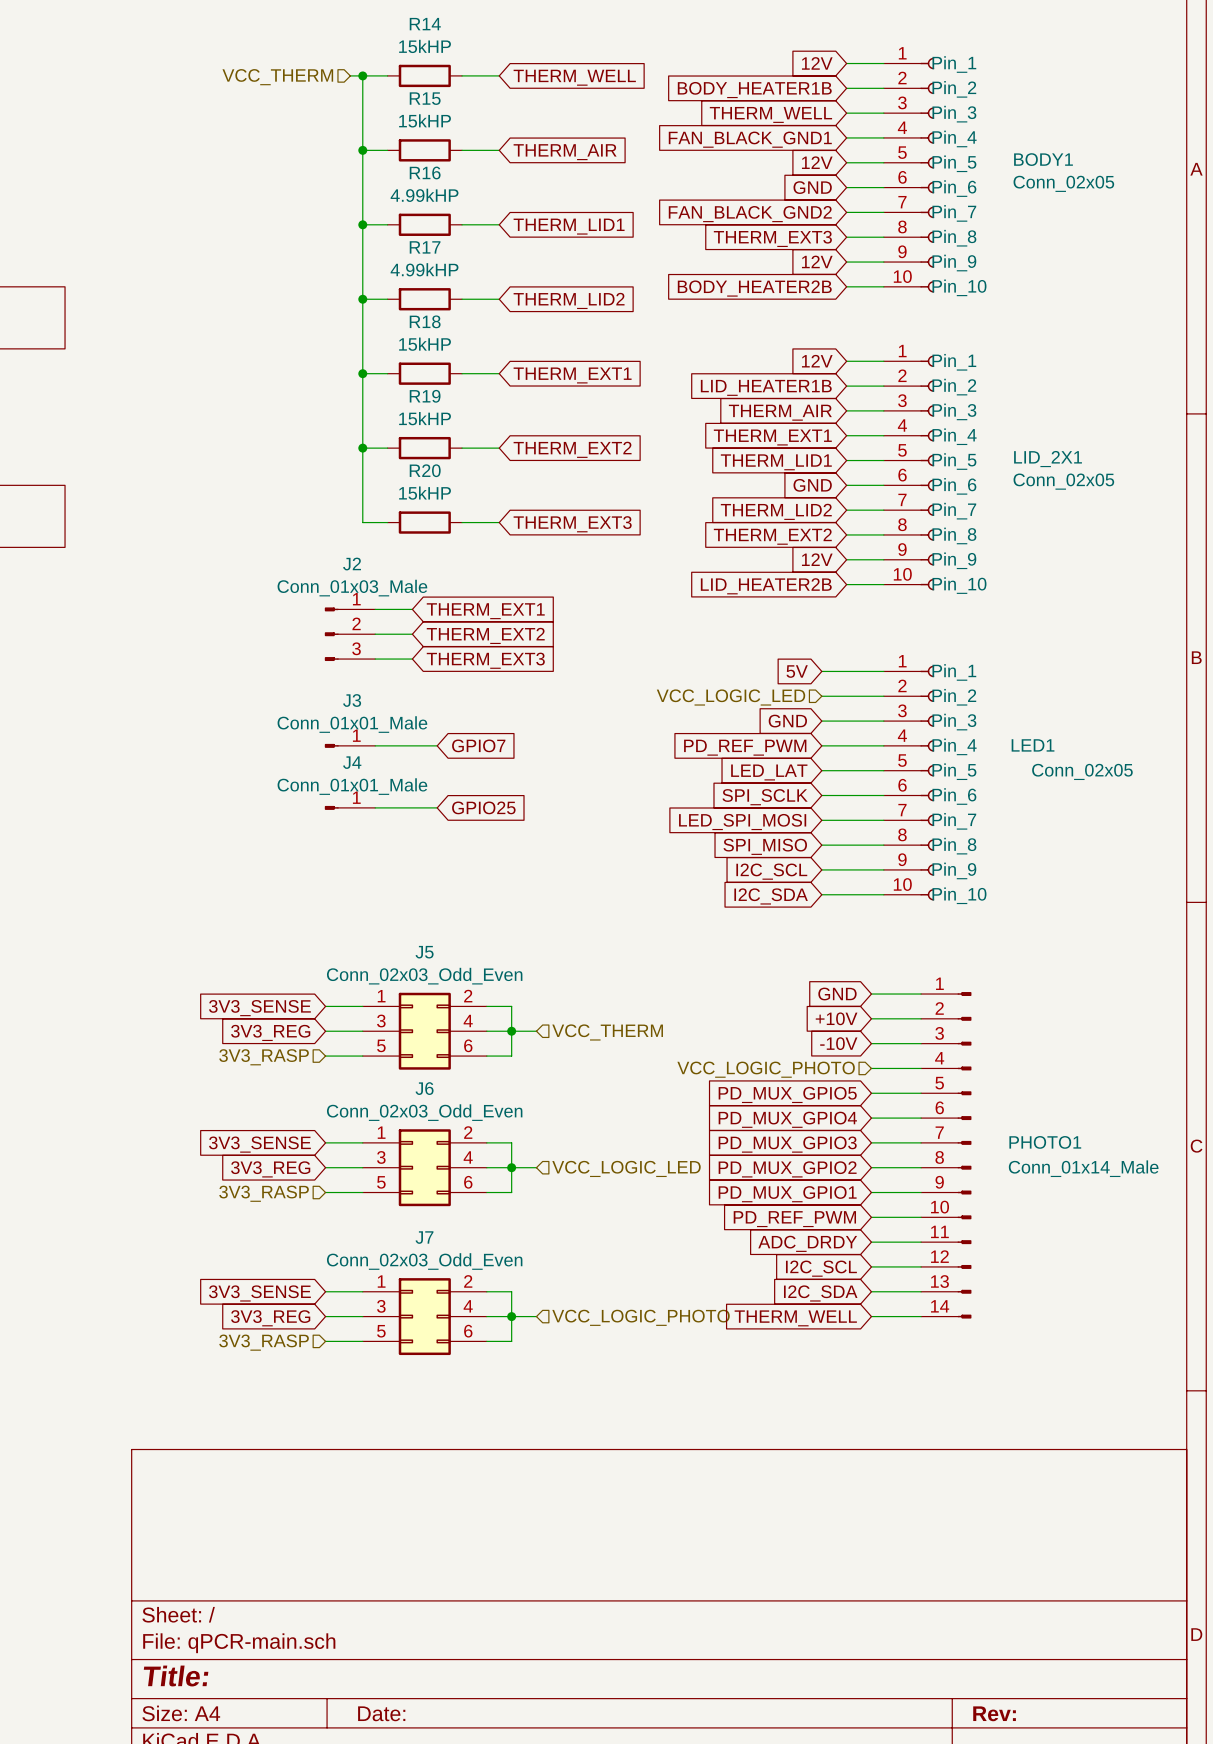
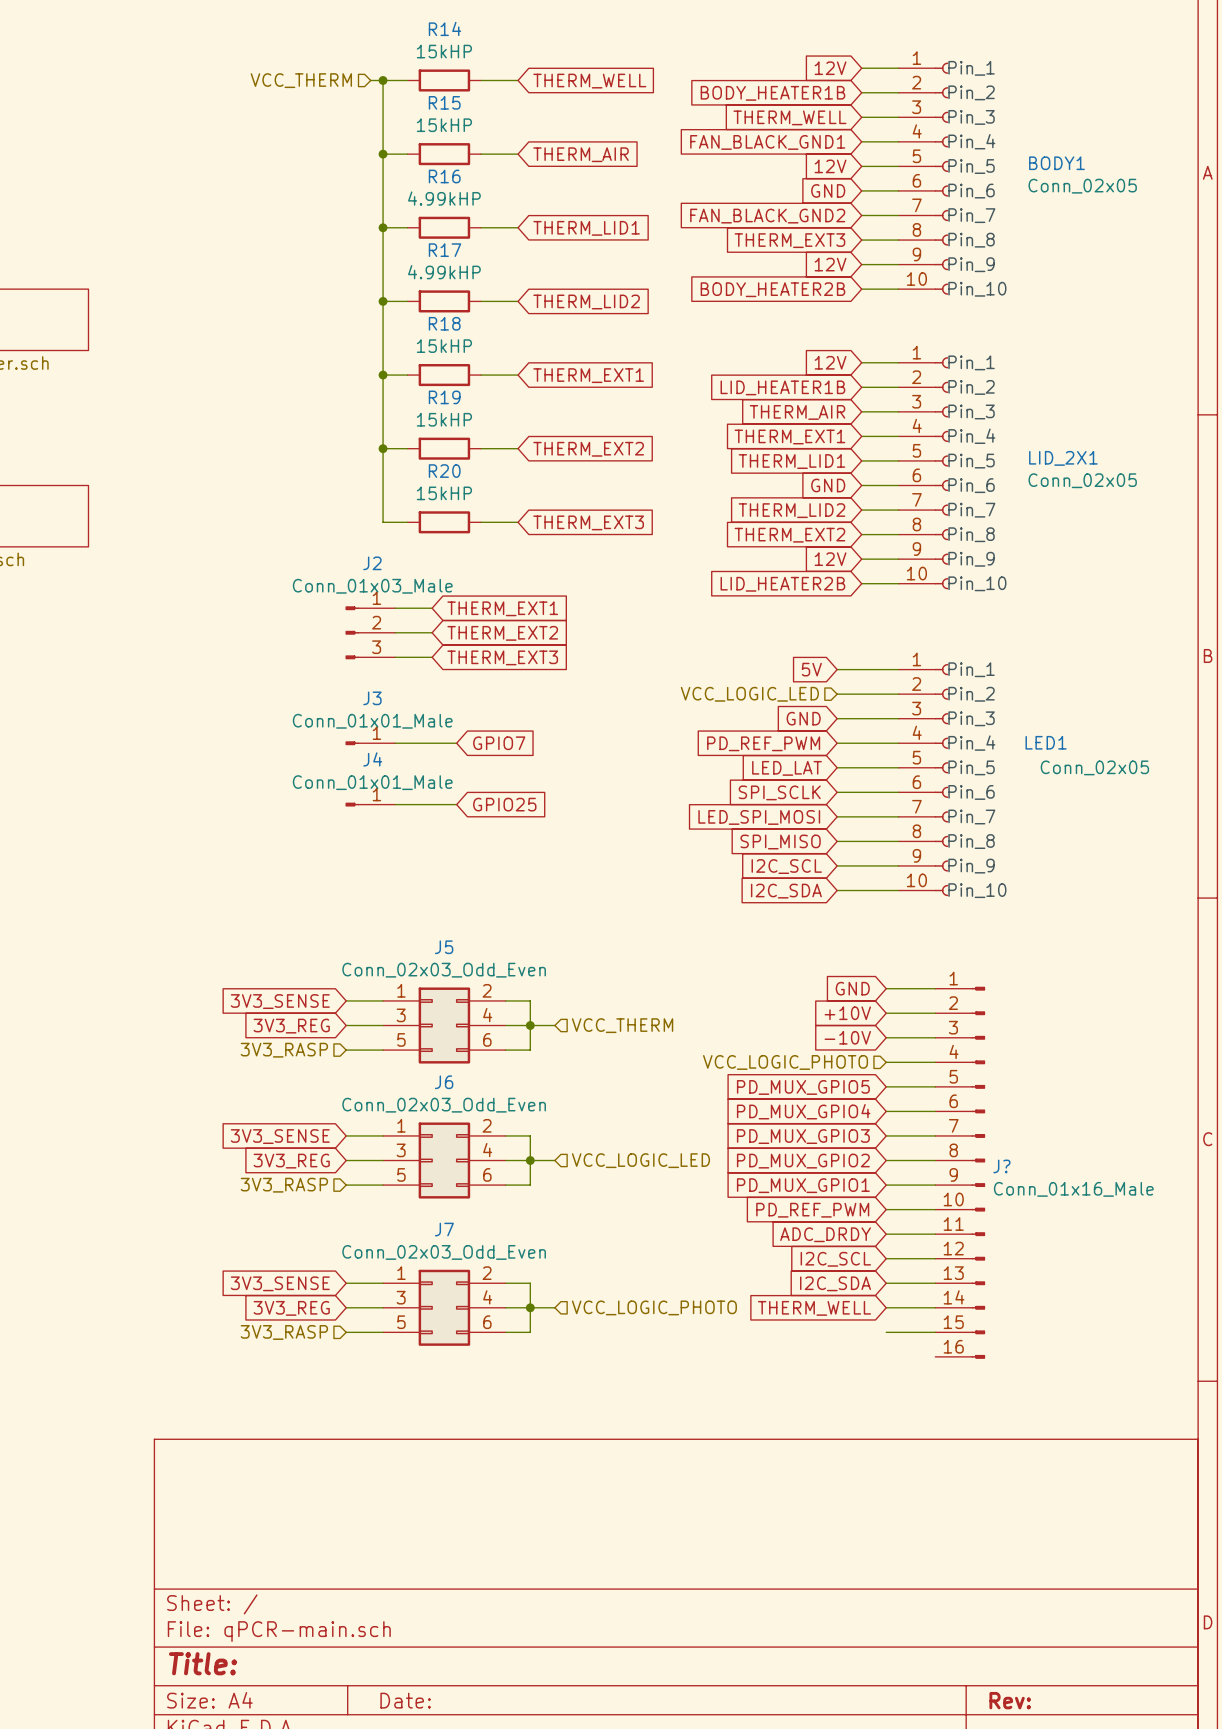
PHOTO1: Conn_01x14_Male (946, 1155) -> none
J?: none -> Conn_01x16_Male (960, 1172)
wire: none -> (886, 1332) (935, 1332)

